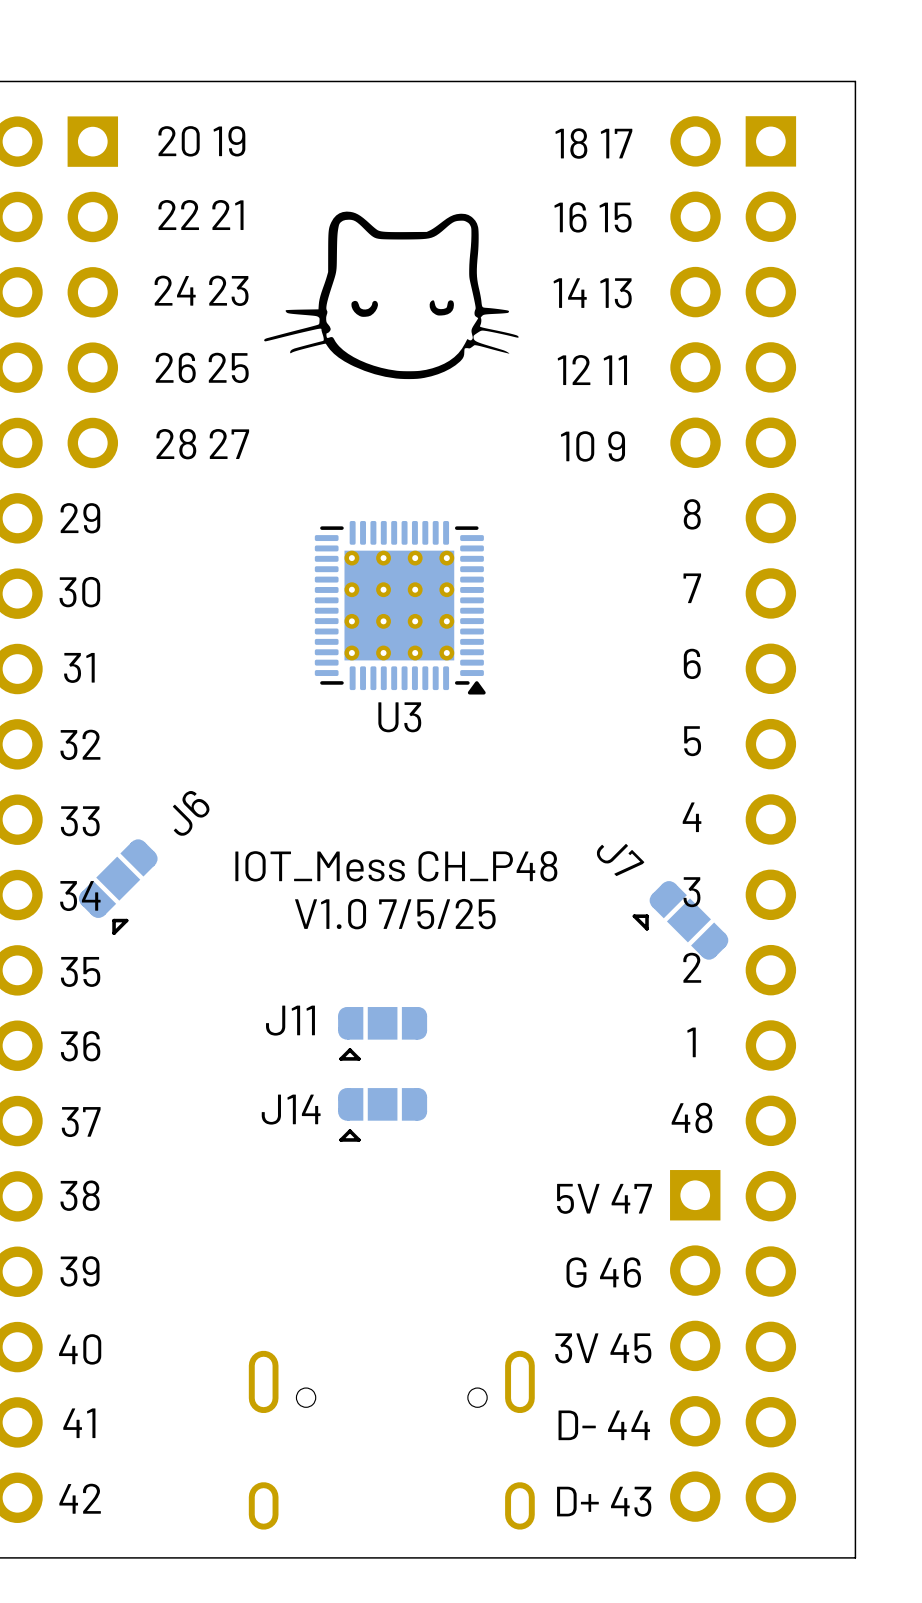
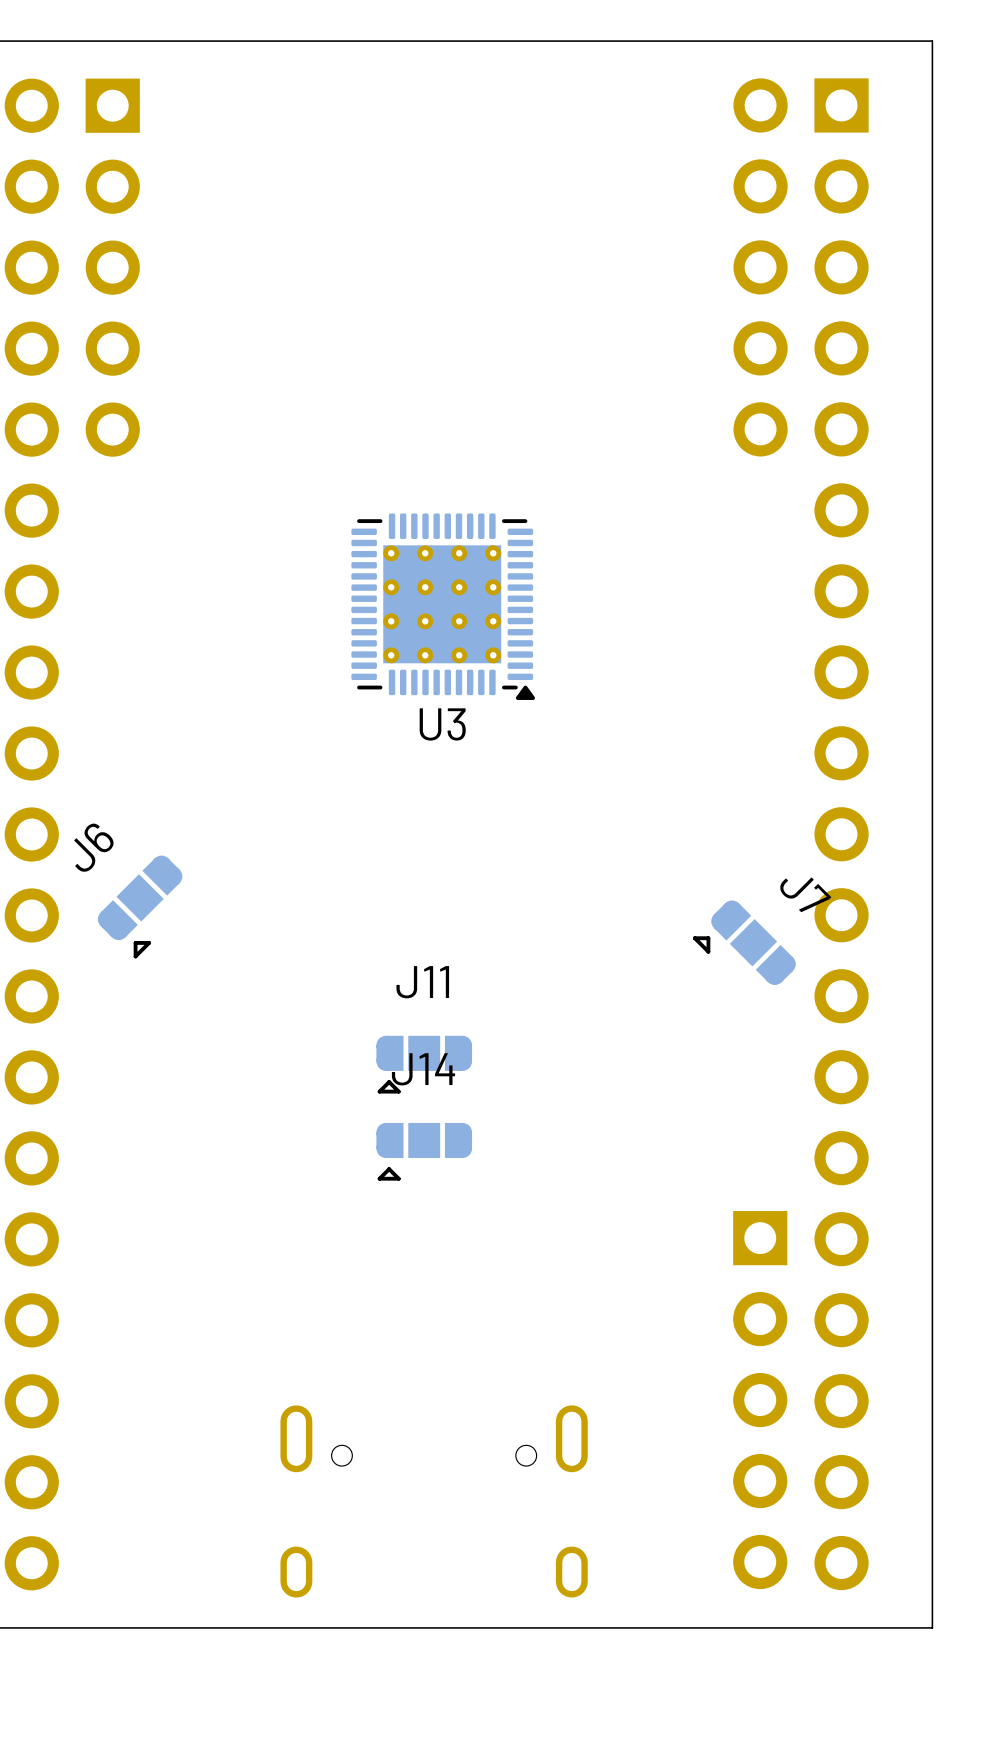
text: 20 19 (201, 141) -> none
text: 18 17 (593, 143) -> none
drawing: [264, 211, 519, 380] -> none
text: 22 21 (200, 215) -> none
text: 16 15 (593, 217) -> none
text: 24 23 (201, 290) -> none
text: 14 13 (592, 293) -> none
text: 26 25 (202, 367) -> none
text: 12 11 (592, 370) -> none
text: 28 27 (202, 444) -> none
text: 10 9 (592, 446) -> none
text: 8 (692, 514) -> none
text: 29 (80, 518) -> none
text: 7 (692, 588) -> none
text: 30 (79, 592) -> none
text: 6 (692, 663) -> none
text: 31 (79, 667) -> none
text: 5 (692, 741) -> none
text: 32 (80, 744) -> none
J6 name position: J6 (191, 813) -> J6 (93, 847)
text: 4 (692, 817) -> none
text: 33 (80, 821) -> none
J7 name position: J7 (620, 859) -> J7 (805, 894)
text: IOT_Mess CH_P48 (396, 866) -> none
text: 3 (691, 892) -> none
text: 34 (80, 896) -> none
text: V1.0 7/5/25 (395, 914) -> none
text: 2 (692, 967) -> none
text: 35 (80, 971) -> none
J11 name position: J11 (290, 1020) -> J11 (422, 982)
text: 1 (691, 1042) -> none
text: 36 (80, 1046) -> none
J14 name position: J14 (291, 1109) -> J14 (423, 1069)
text: 48 (692, 1117) -> none
text: 37 (81, 1122) -> none
text: 38 (80, 1195) -> none
text: 5V 47 (604, 1198) -> none
text: 39 (79, 1271) -> none
text: G 46 (603, 1272) -> none
text: 3V 45 (603, 1348) -> none
text: 40 (80, 1349) -> none
text: 41 (79, 1423) -> none
text: D- 44 (604, 1425) -> none
text: 42 (80, 1498) -> none
text: D+ 43 (604, 1501) -> none

